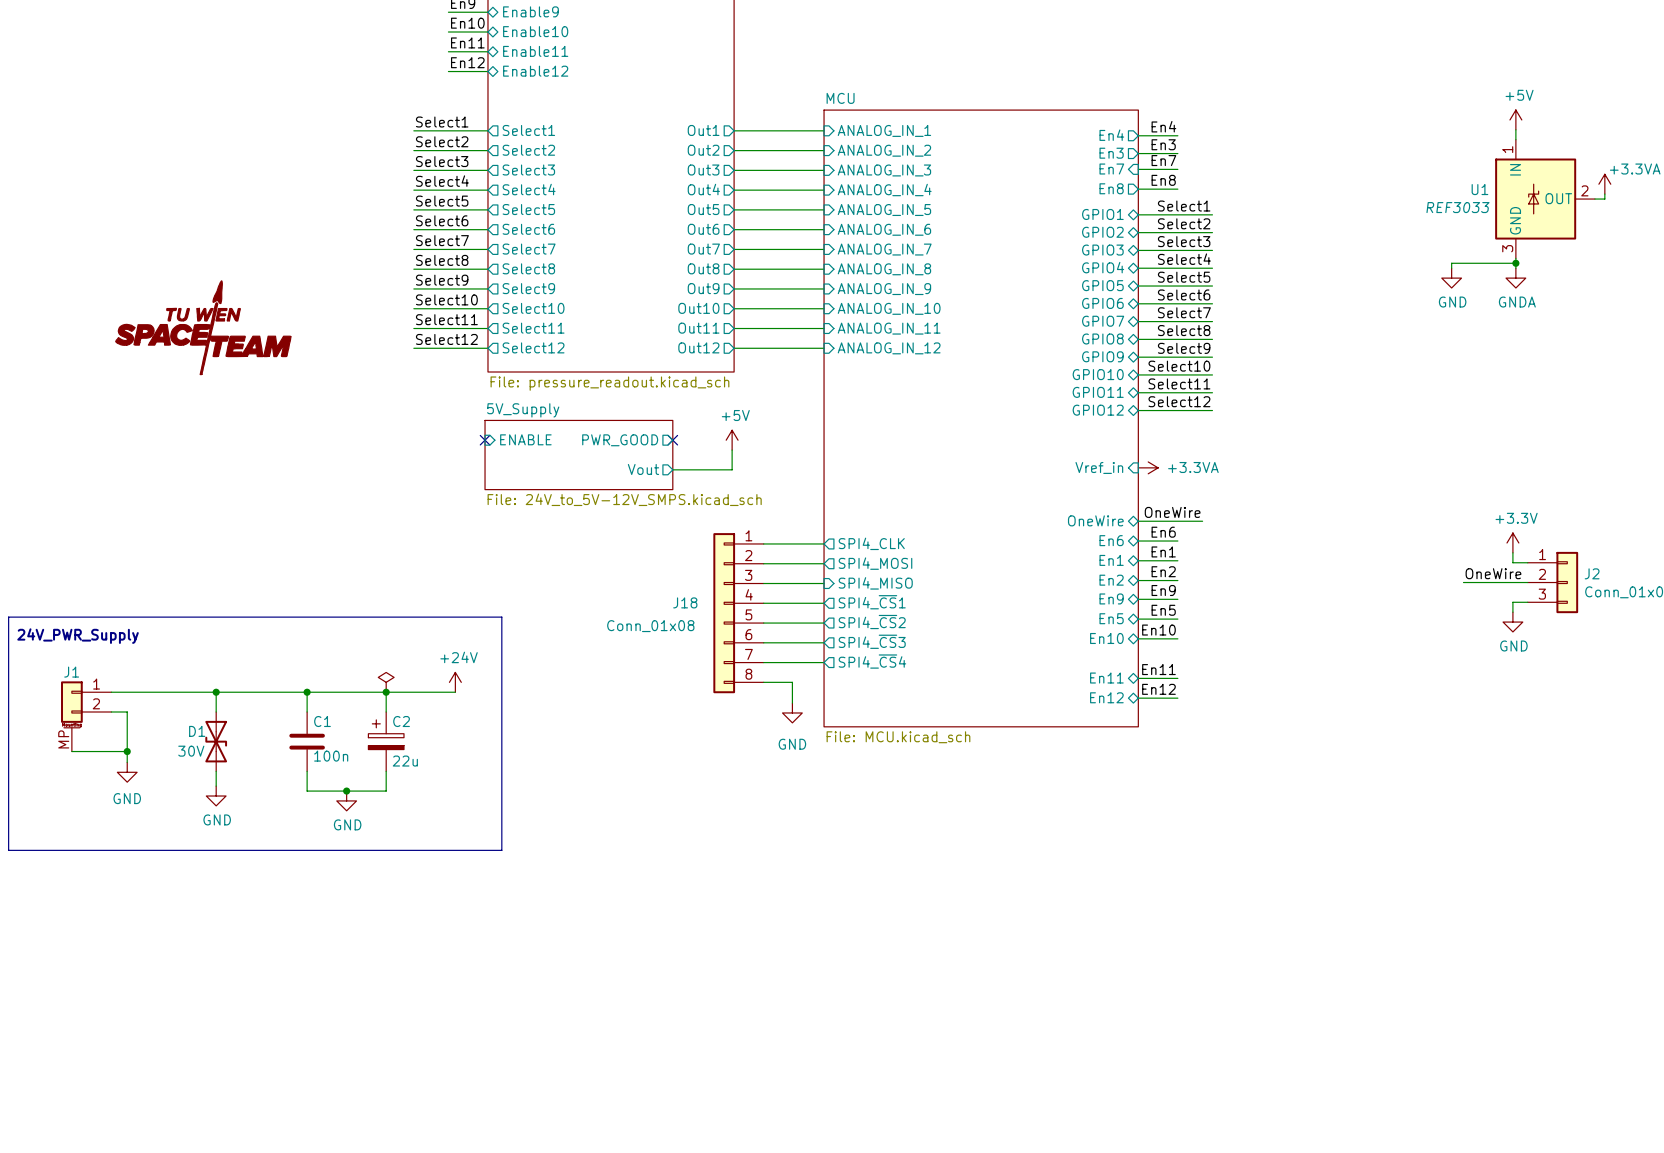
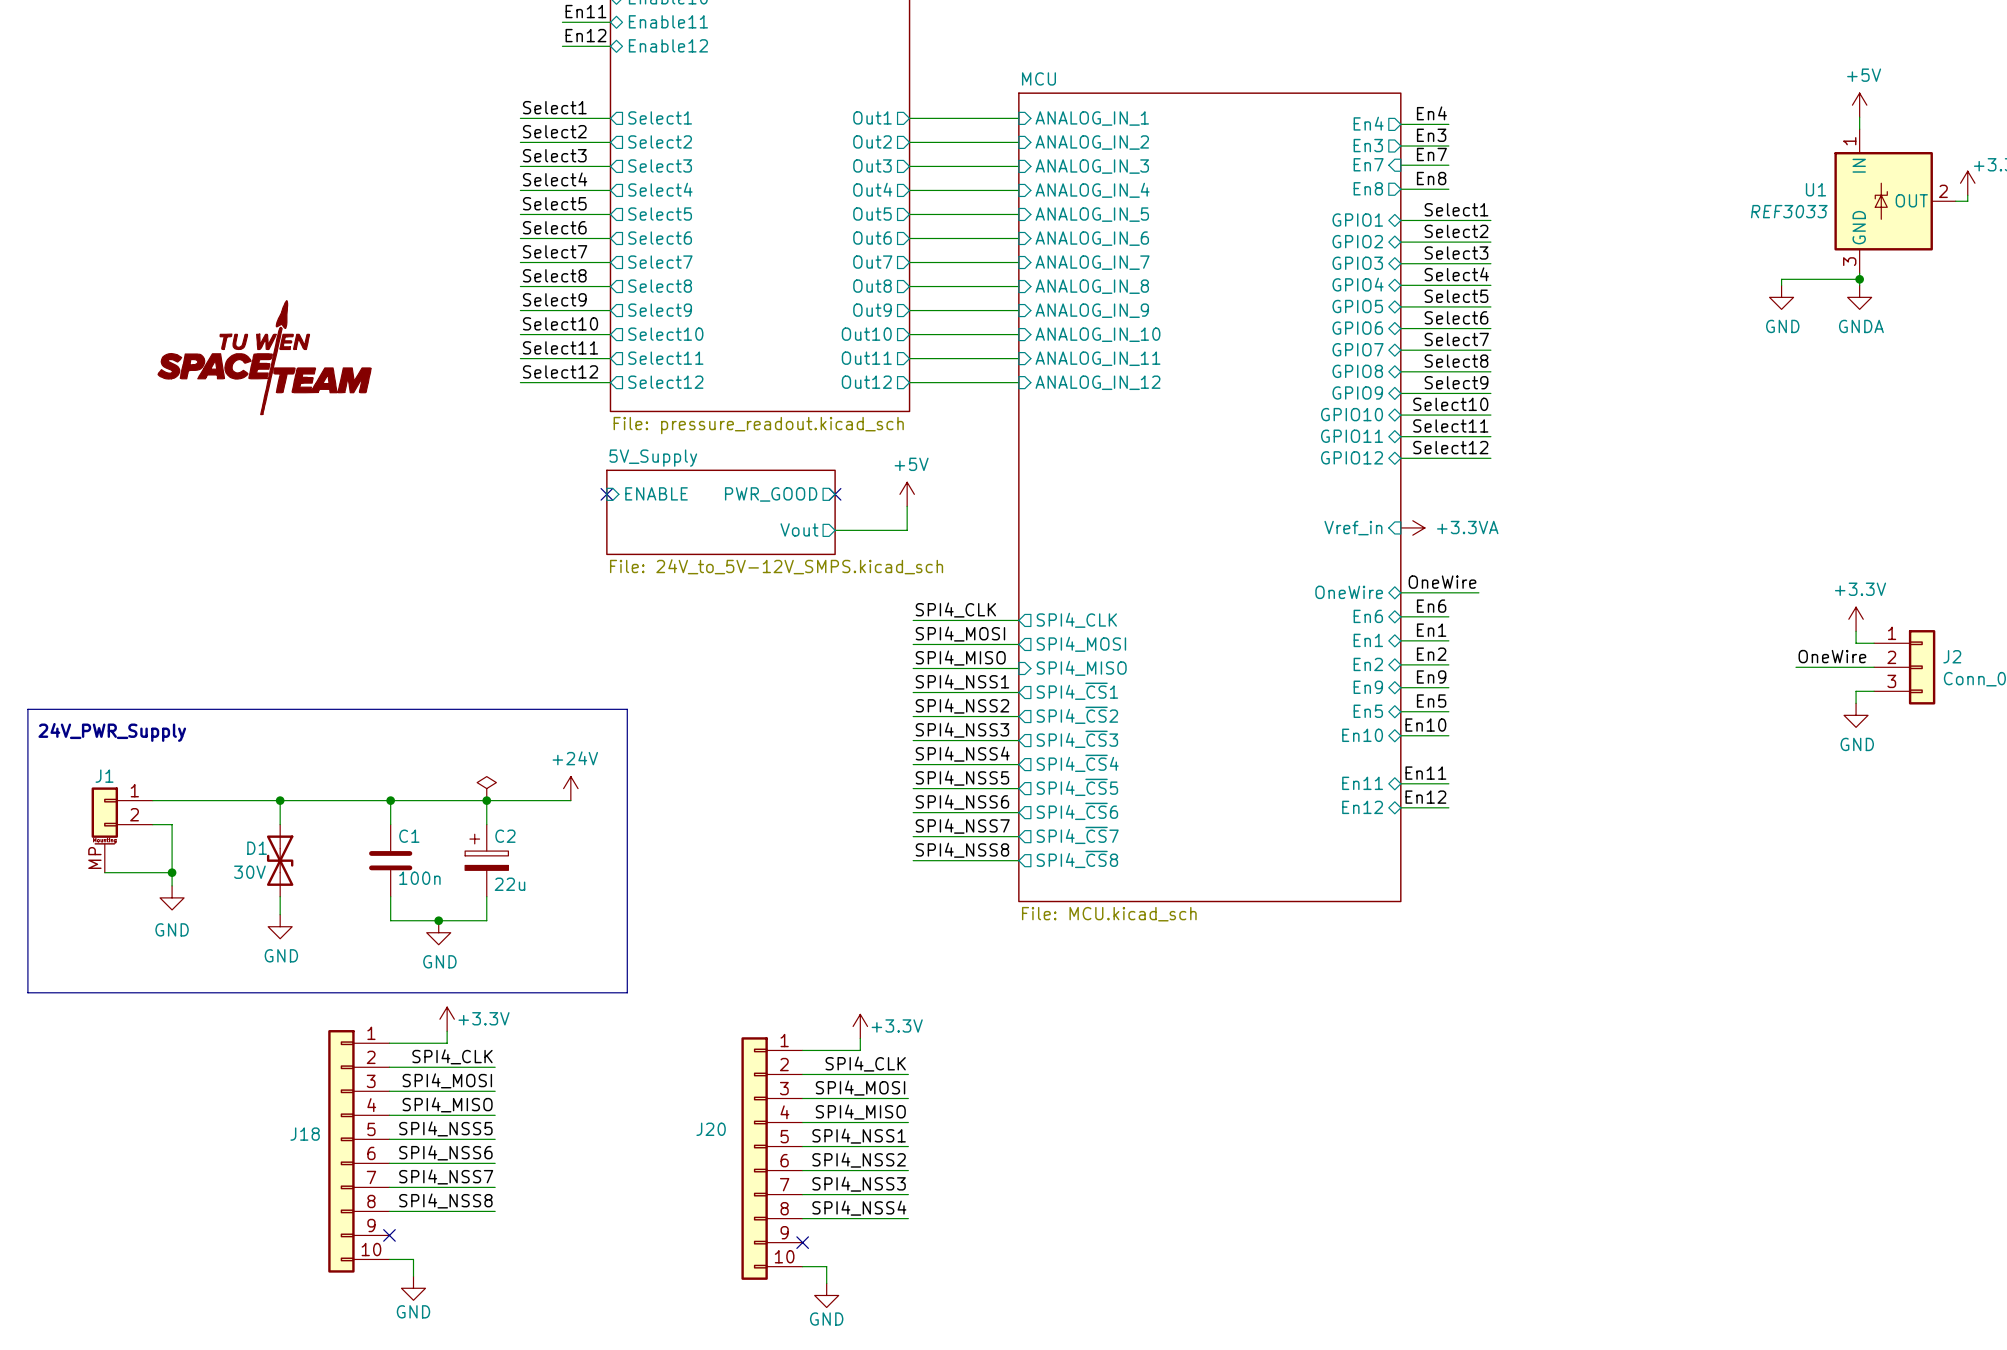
sheet MCU: File: MCU.kicad_sch (981, 418) -> none
sheet MCU: none -> File: MCU.kicad_sch (1209, 497)
J18 symbol: [713, 533, 764, 694] -> [328, 1030, 390, 1273]
label: none -> SPI4_CLK (955, 610)
label: none -> SPI4_MOSI (960, 634)
label: none -> SPI4_MISO (960, 658)
label: none -> SPI4_NSS1 (962, 682)
label: none -> SPI4_NSS2 (962, 706)
J18 value: Conn_01x08 (650, 626) -> none
label: none -> SPI4_NSS3 (962, 730)
label: none -> SPI4_NSS4 (962, 754)
label: none -> SPI4_NSS5 (962, 778)
sheet pin: none -> SPI4_~{CS}5 (1077, 787)
wire: (792, 682) (792, 703) -> (980, 788) (1018, 788)
label: none -> SPI4_NSS6 (962, 802)
sheet pin: none -> SPI4_~{CS}6 (1077, 811)
wire: none -> (913, 812) (1018, 812)
power symbol: GND (792, 712) -> none
label: none -> SPI4_NSS7 (962, 826)
sheet pin: none -> SPI4_~{CS}7 (1077, 835)
wire: none -> (913, 836) (1018, 836)
label: none -> SPI4_NSS8 (962, 850)
sheet pin: none -> SPI4_~{CS}8 (1077, 859)
wire: none -> (913, 860) (1018, 860)
power symbol: none -> +3.3V (447, 1019)
power symbol: none -> +3.3V (860, 1026)
wire: none -> (447, 1031) (447, 1043) (389, 1043)
wire: none -> (860, 1038) (860, 1050) (802, 1050)
label: none -> SPI4_CLK (452, 1056)
label: none -> SPI4_CLK (865, 1064)
wire: none -> (389, 1067) (495, 1067)
wire: none -> (802, 1074) (908, 1074)
label: none -> SPI4_MOSI (447, 1080)
label: none -> SPI4_MOSI (860, 1088)
wire: none -> (389, 1091) (495, 1091)
wire: none -> (802, 1098) (908, 1098)
label: none -> SPI4_MISO (447, 1104)
label: none -> SPI4_MISO (860, 1112)
wire: none -> (389, 1115) (495, 1115)
wire: none -> (802, 1122) (908, 1122)
label: none -> SPI4_NSS5 (445, 1128)
label: none -> SPI4_NSS1 (859, 1136)
wire: none -> (389, 1139) (495, 1139)
wire: none -> (802, 1146) (908, 1146)
label: none -> SPI4_NSS6 (445, 1152)
J20: none -> (772, 1158)
label: none -> SPI4_NSS2 (859, 1160)
wire: none -> (389, 1163) (495, 1163)
wire: none -> (802, 1170) (908, 1170)
label: none -> SPI4_NSS7 (446, 1176)
label: none -> SPI4_NSS3 (859, 1184)
wire: none -> (389, 1187) (495, 1187)
wire: none -> (802, 1194) (908, 1194)
label: none -> SPI4_NSS8 (445, 1200)
label: none -> SPI4_NSS4 (859, 1208)
wire: none -> (389, 1211) (495, 1211)
wire: none -> (802, 1218) (908, 1218)
no-connect mark: none -> (389, 1235)
no-connect mark: none -> (802, 1242)
wire: none -> (389, 1259) (413, 1259) (413, 1276)
wire: none -> (802, 1266) (826, 1266) (826, 1283)
power symbol: none -> GND (413, 1288)
power symbol: none -> GND (826, 1295)

